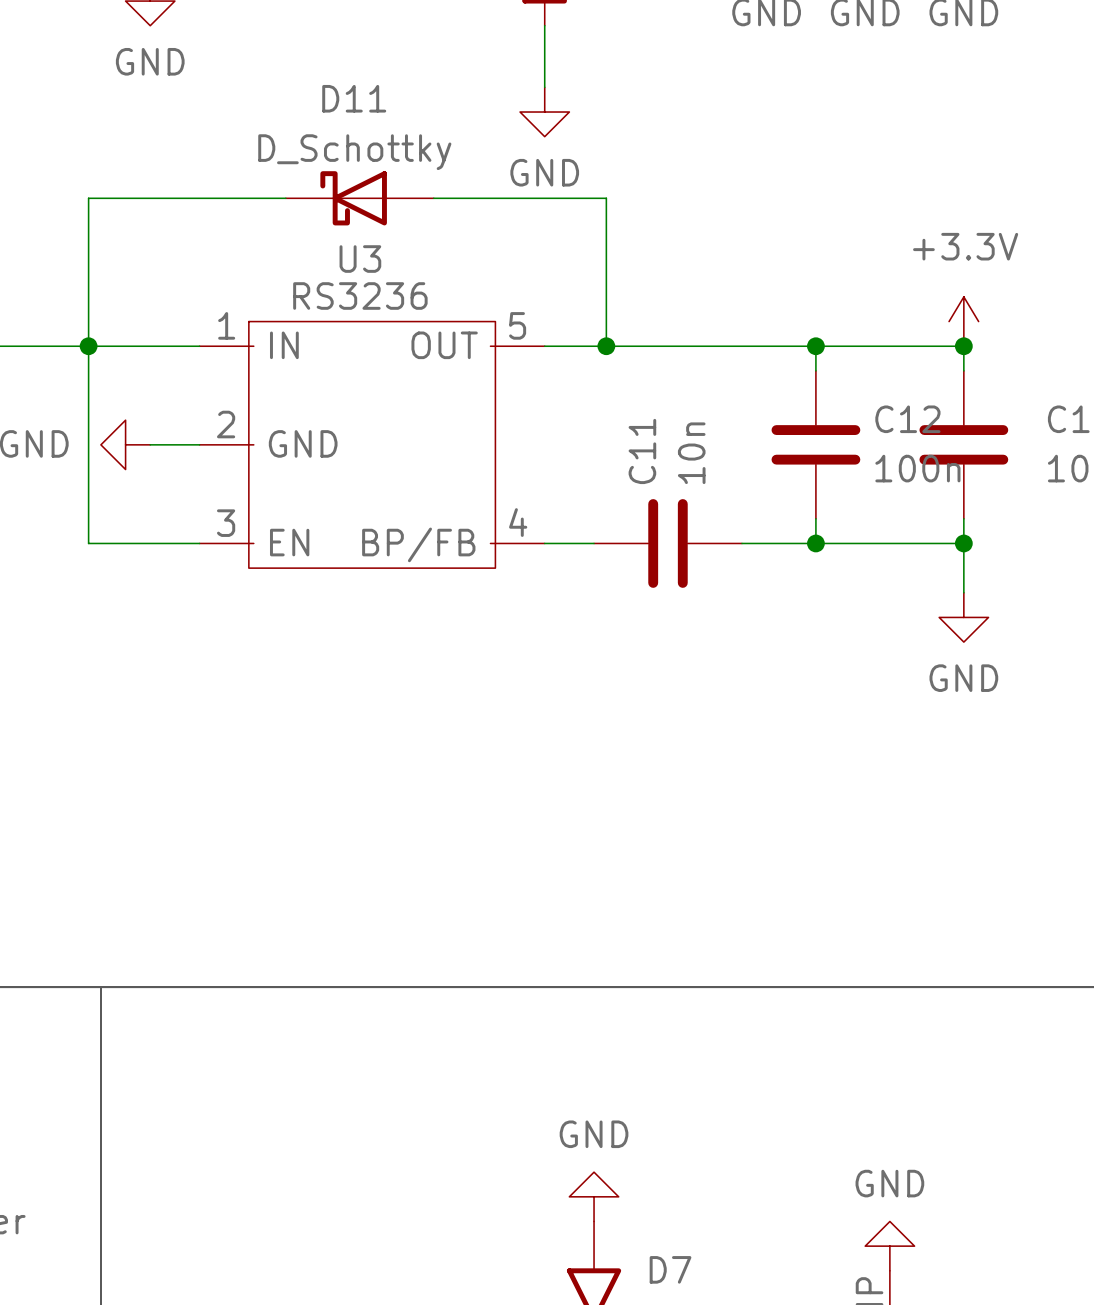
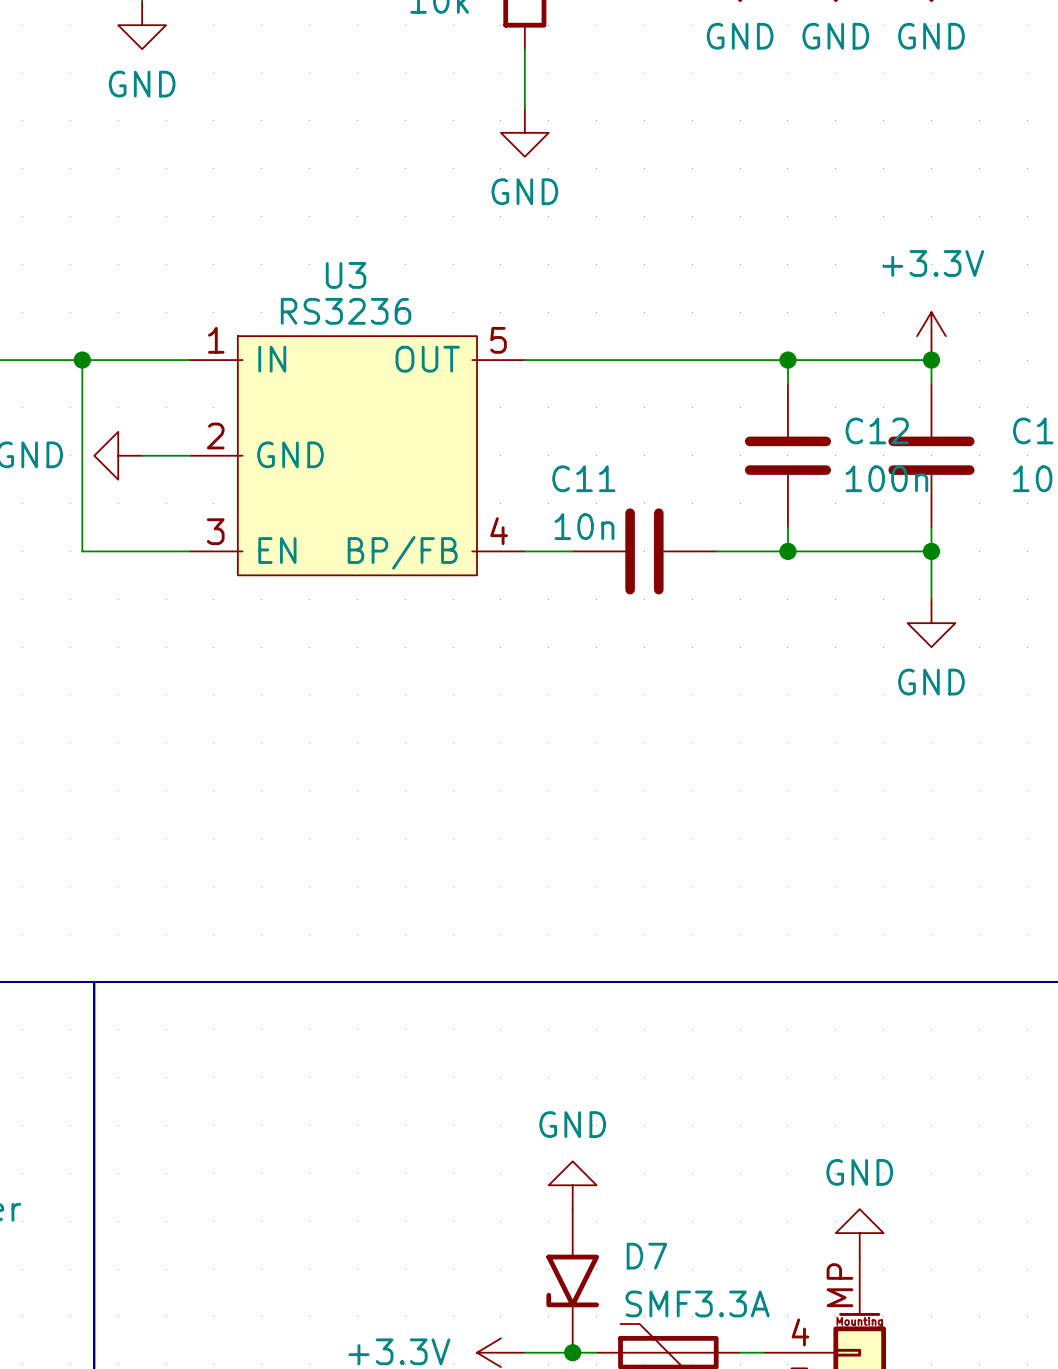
wire: (285, 198) (88, 198) (88, 346) -> none
D11: D_Schottky (359, 198) -> none
wire: (433, 198) (606, 198) (606, 346) -> none
junction: (606, 346) -> none
C11 name rotation: 0° (642, 451) -> 90° clockwise (583, 478)
C11 value rotation: 0° (691, 453) -> 90° clockwise (584, 526)
C11 value position: 10n (691, 453) -> 10n (584, 526)

